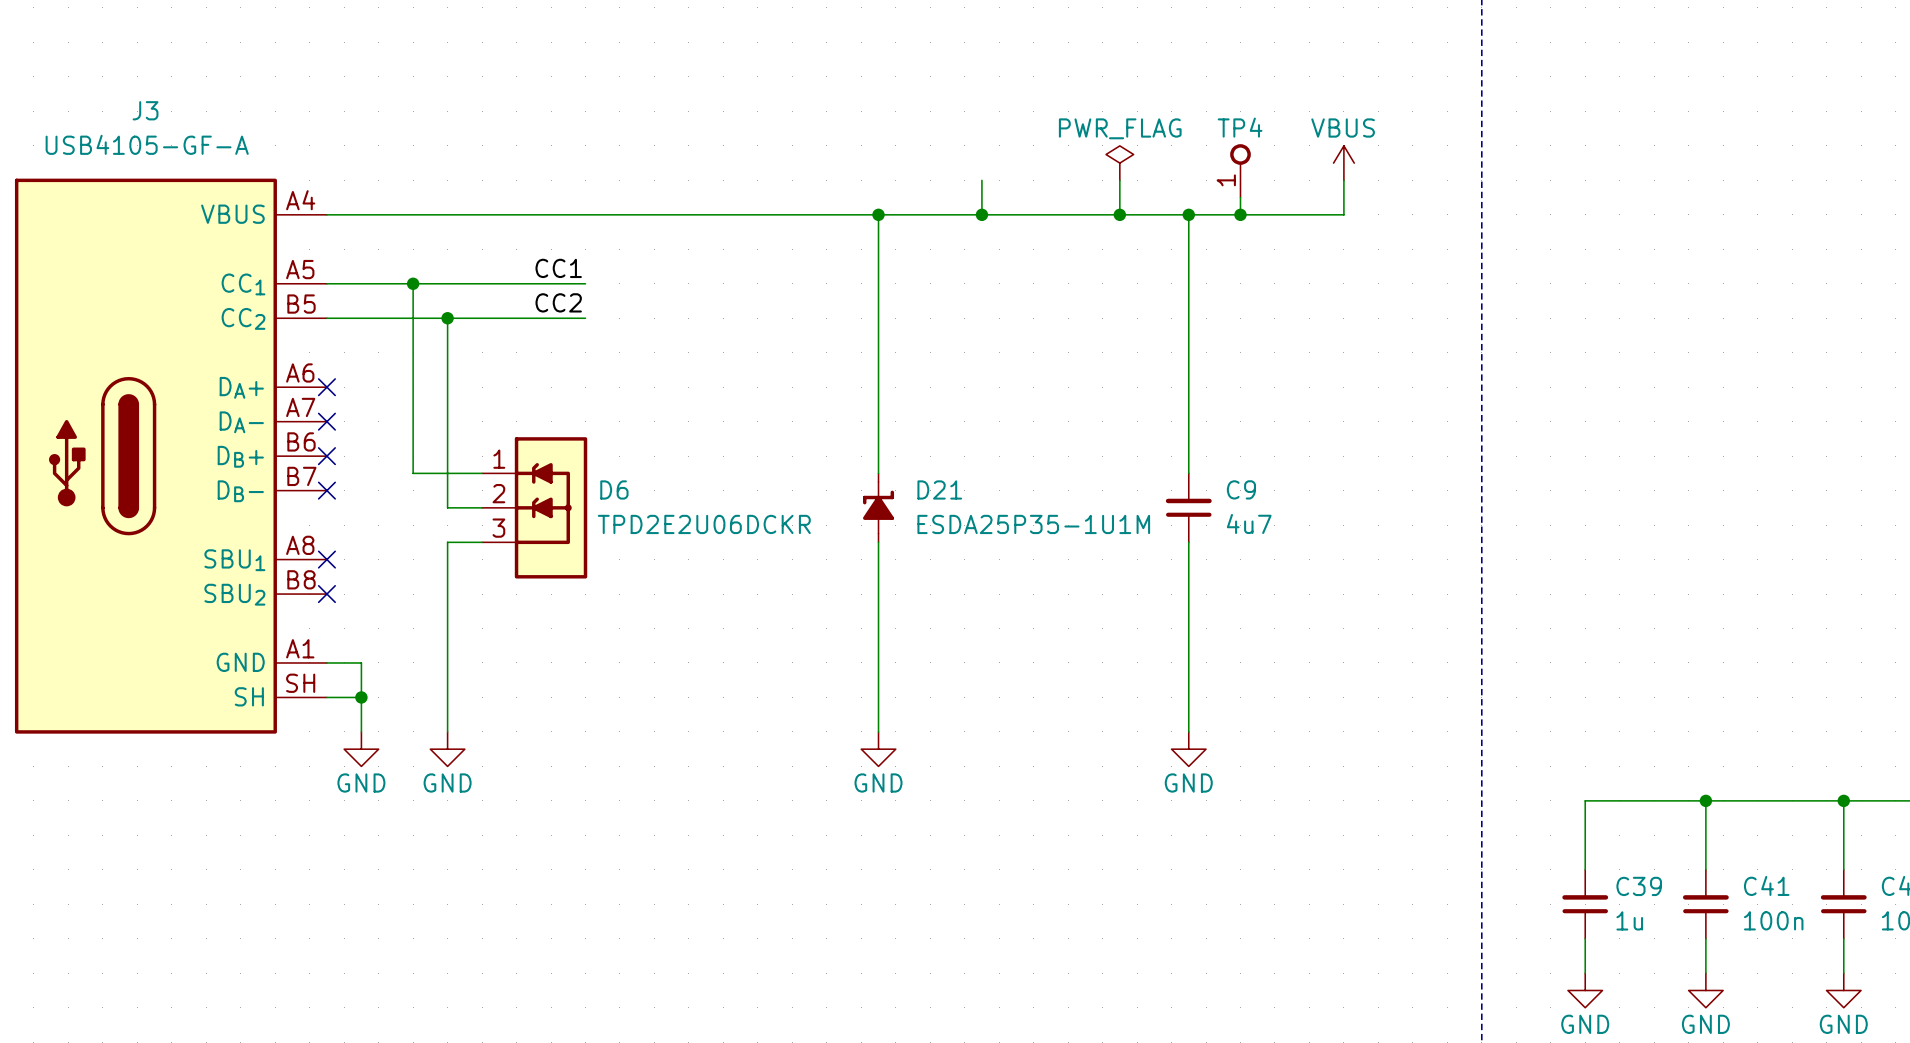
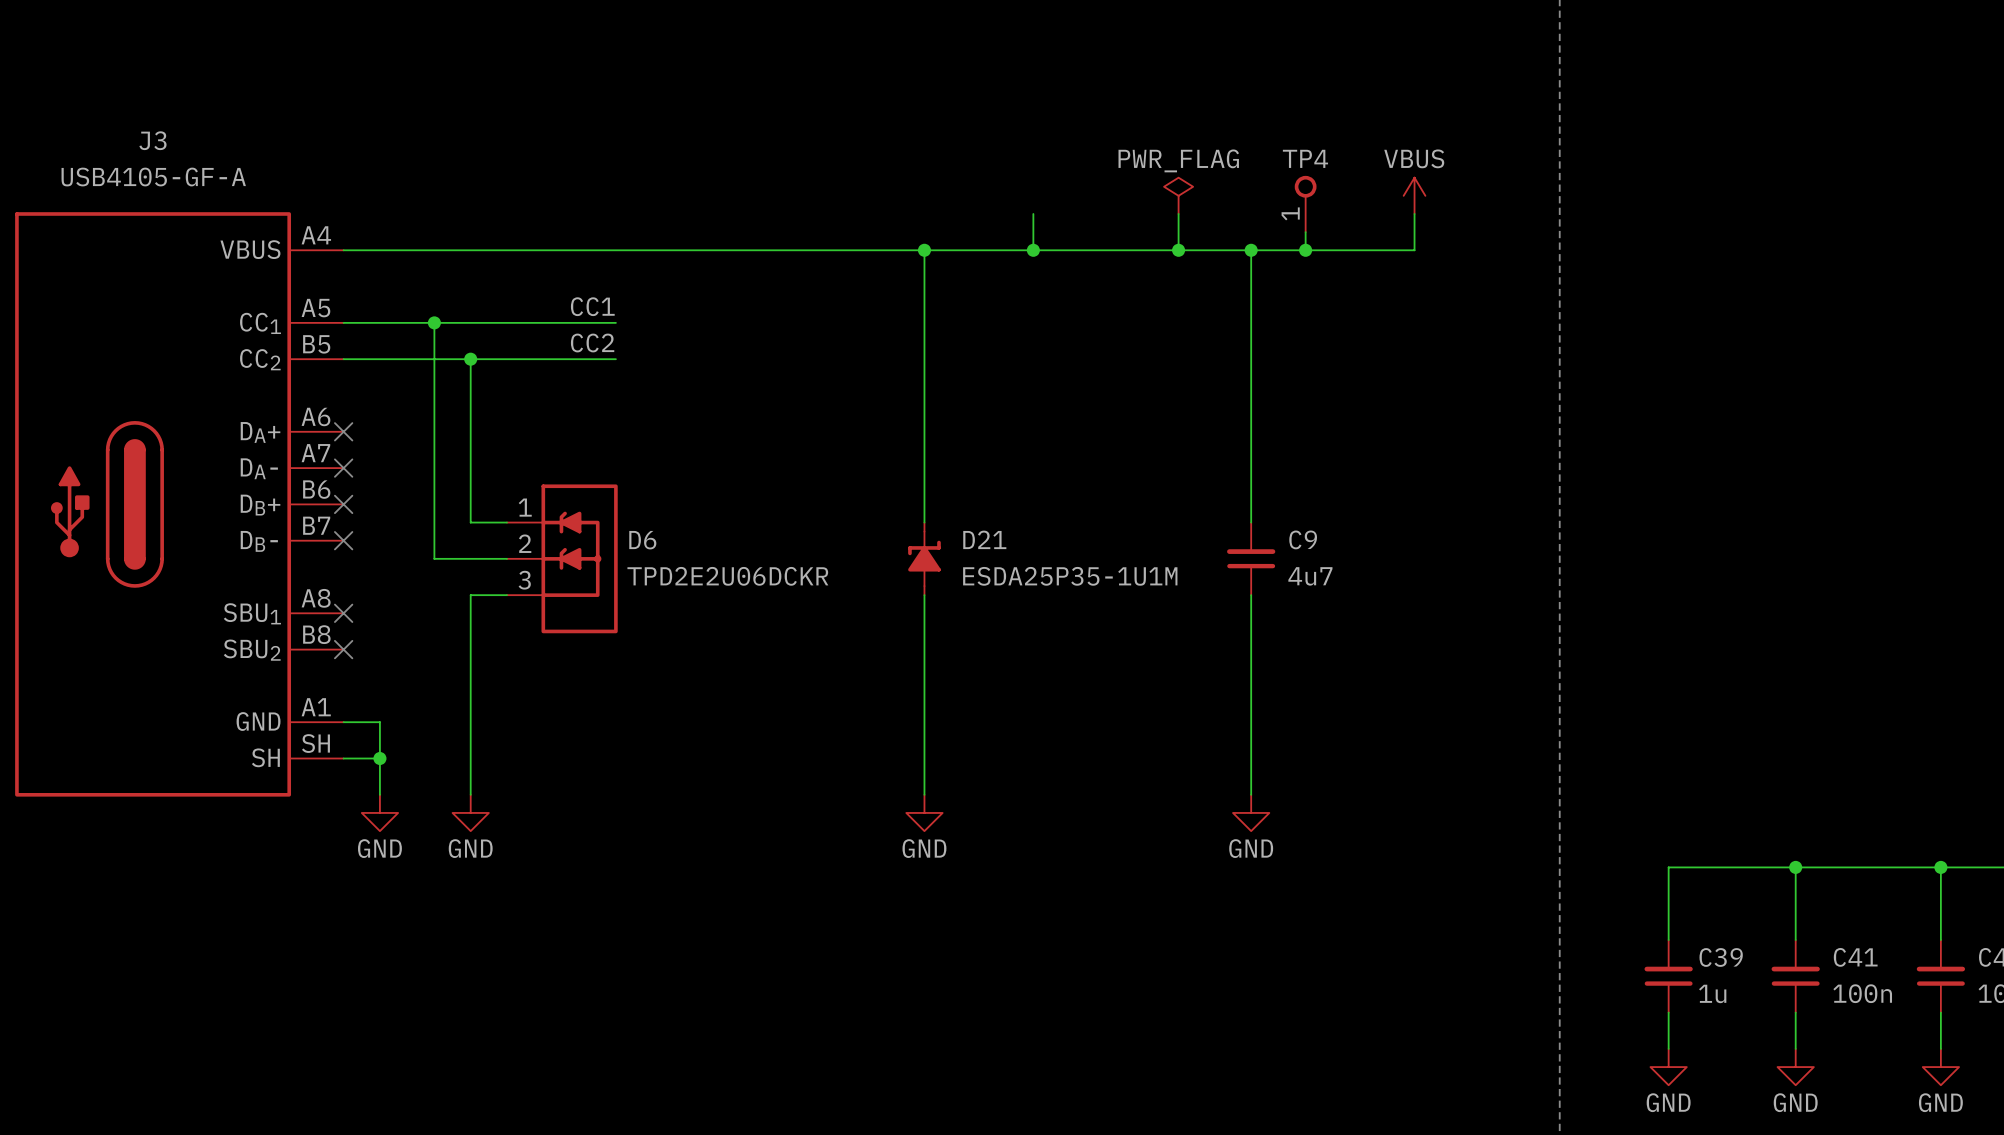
wire: (413, 473) (447, 473) (447, 507) -> (434, 522) (434, 558) (470, 558)

